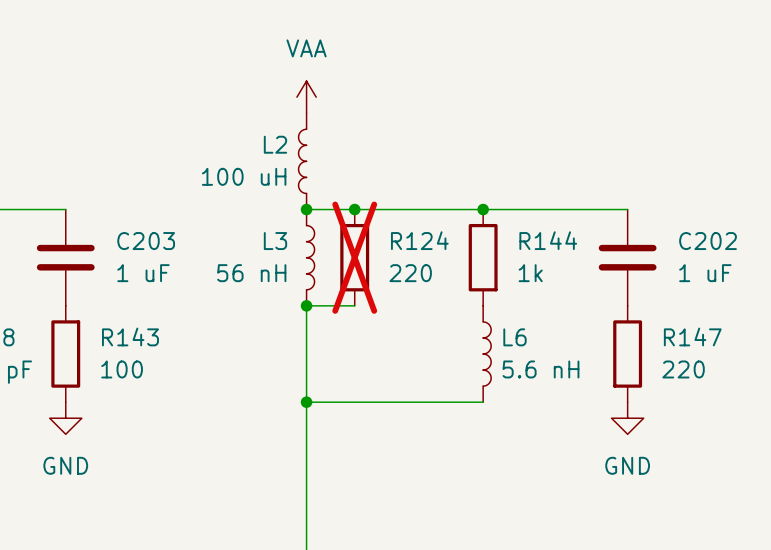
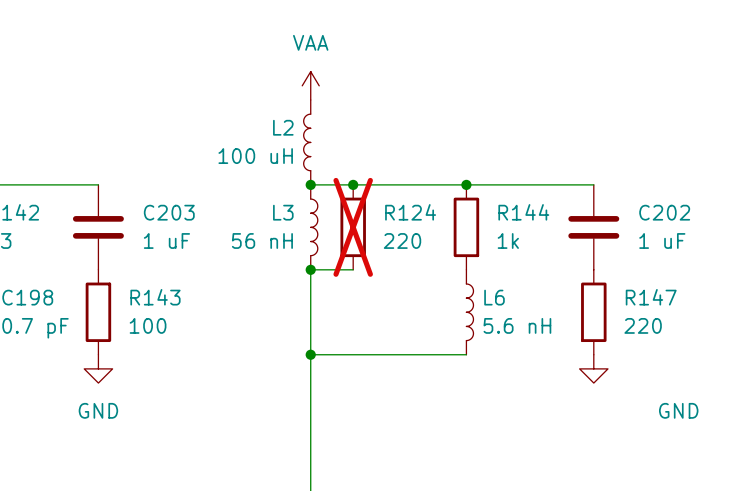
power symbol text position: GND (627, 465) -> GND (678, 410)

